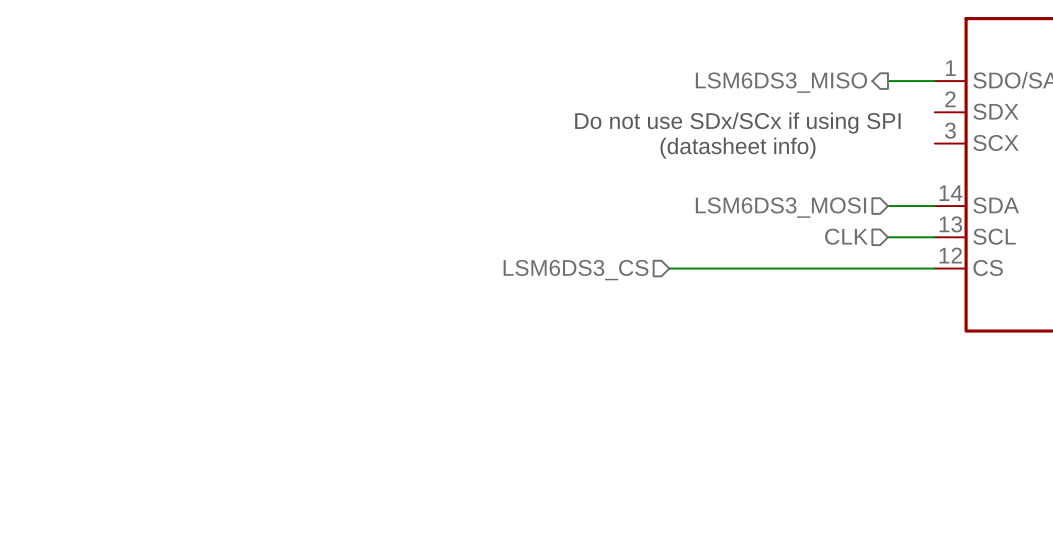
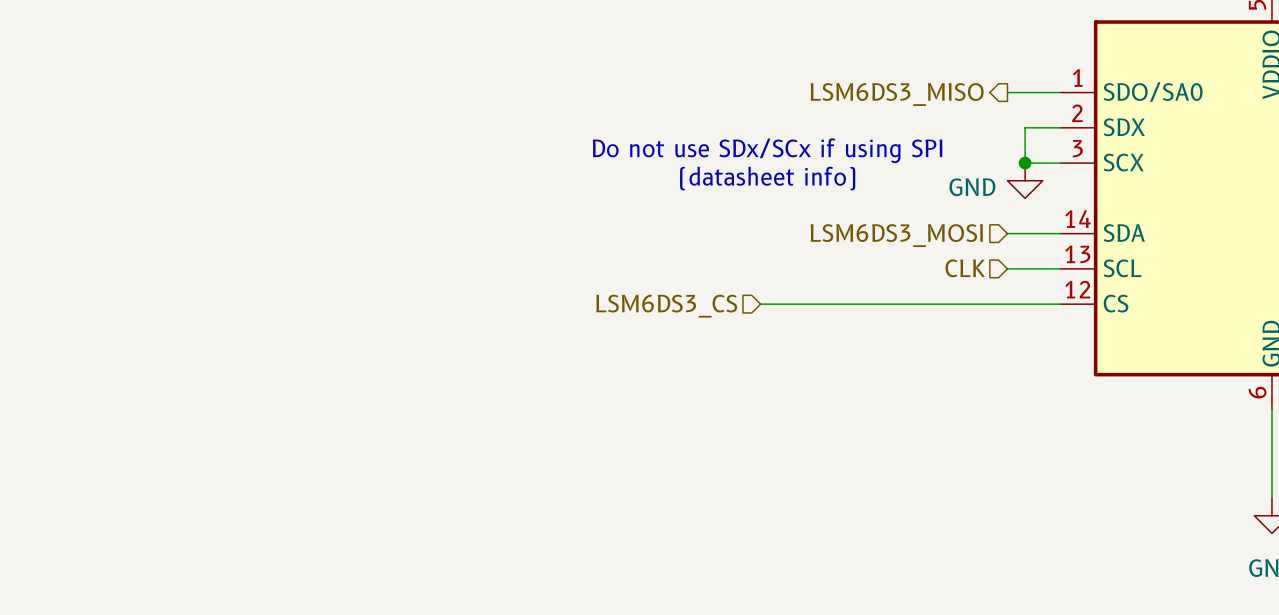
wire: none -> (1060, 127) (1025, 127) (1025, 163) (1060, 163)
text position: Do not use SDx/SCx if using SPI (737, 123) -> Do not use SDx/SCx if using SPI (767, 150)
junction: none -> (1025, 163)
text position: (datasheet info) (738, 148) -> (datasheet info) (767, 178)
power symbol: none -> GND (1025, 180)

